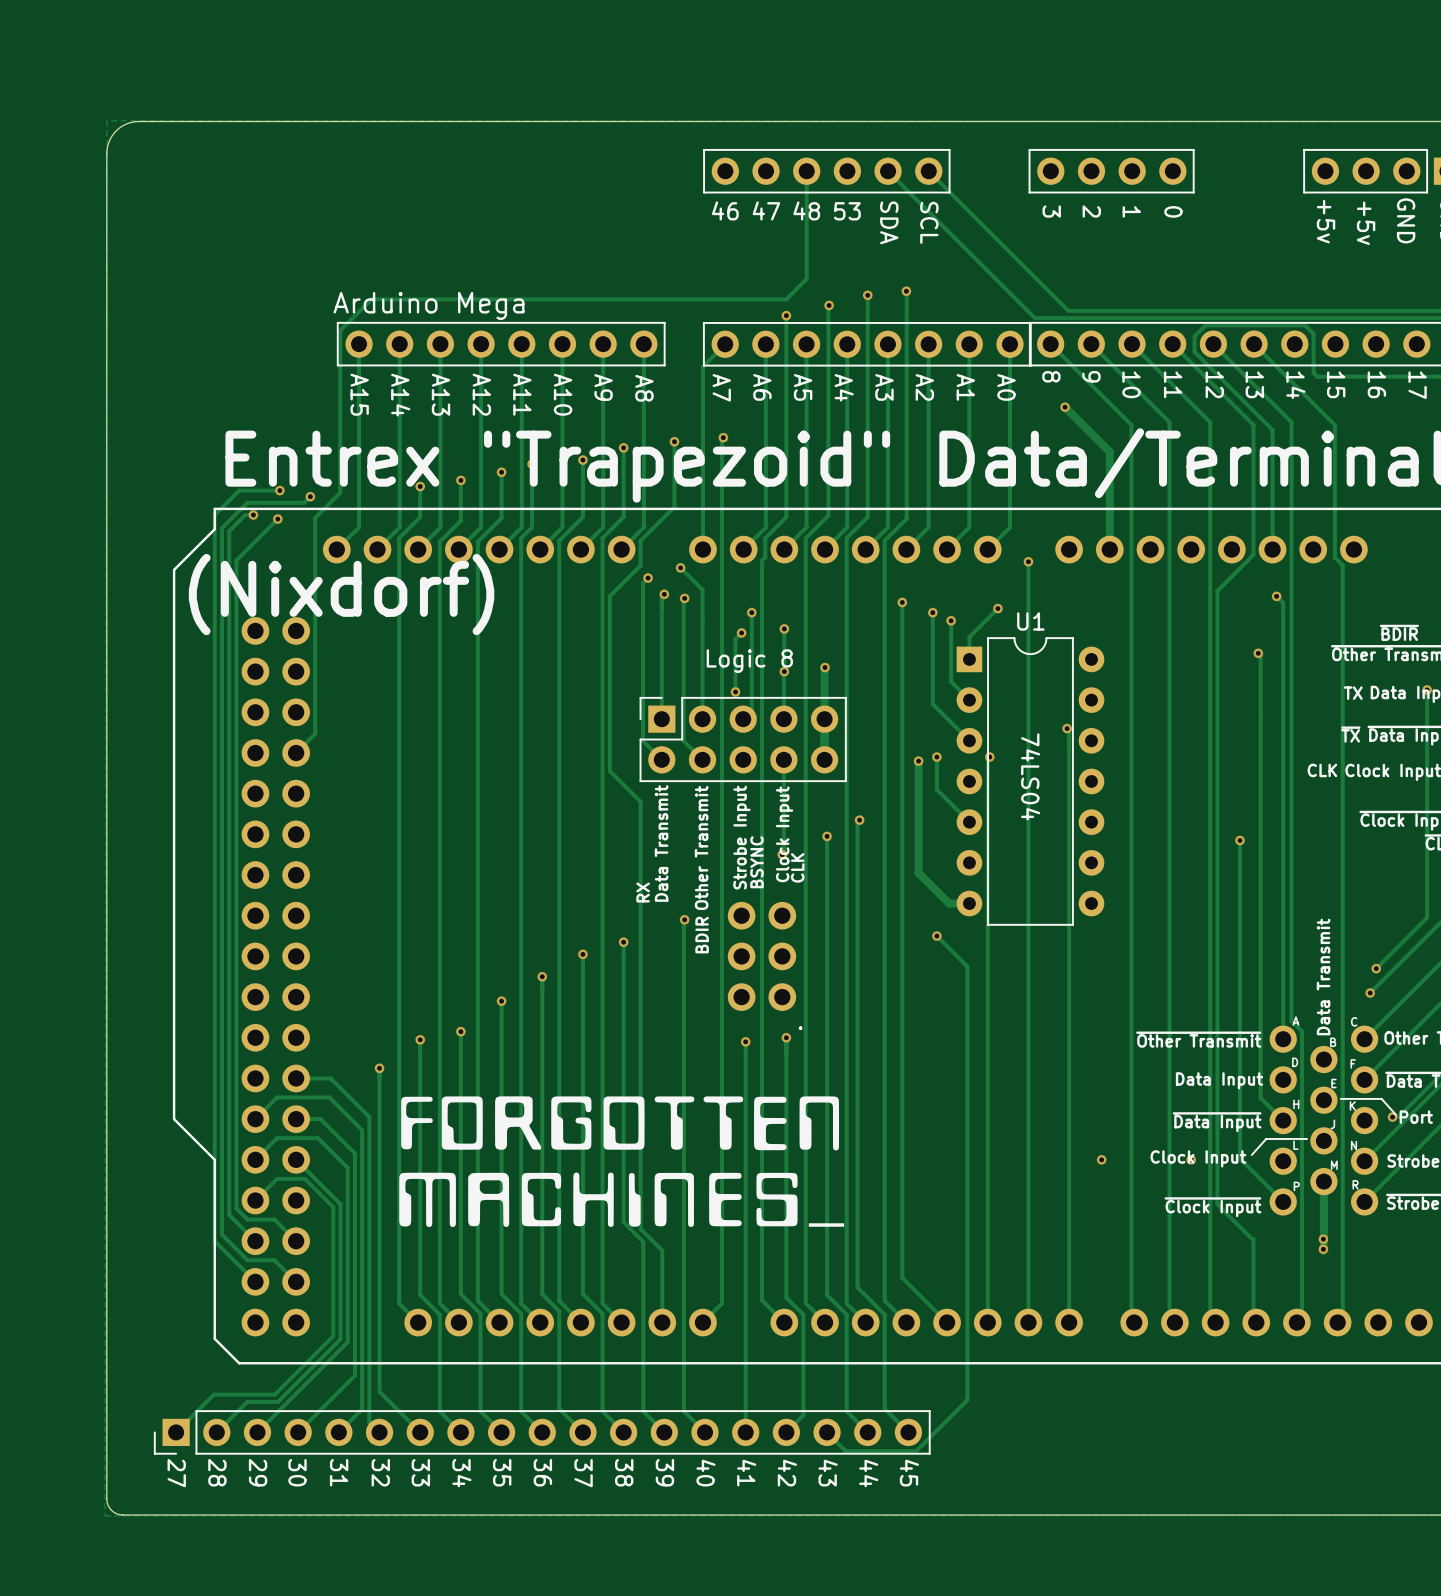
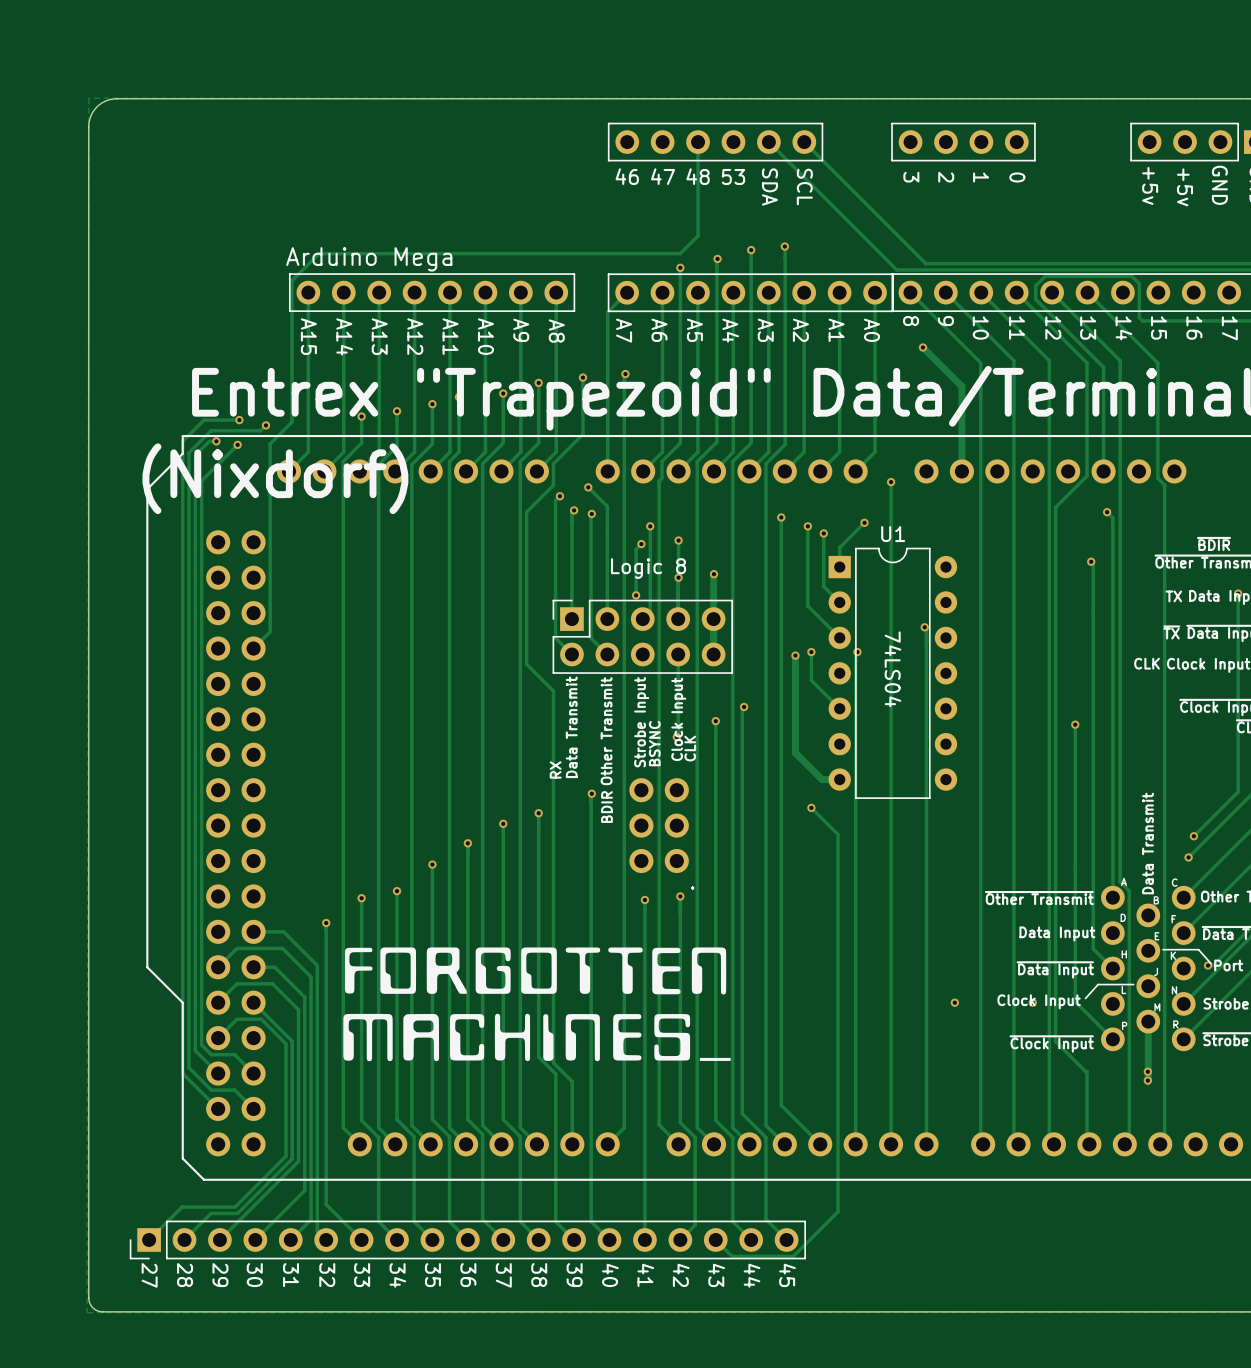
text position: (Nixdorf) (341, 594) -> (Nixdorf) (275, 478)

